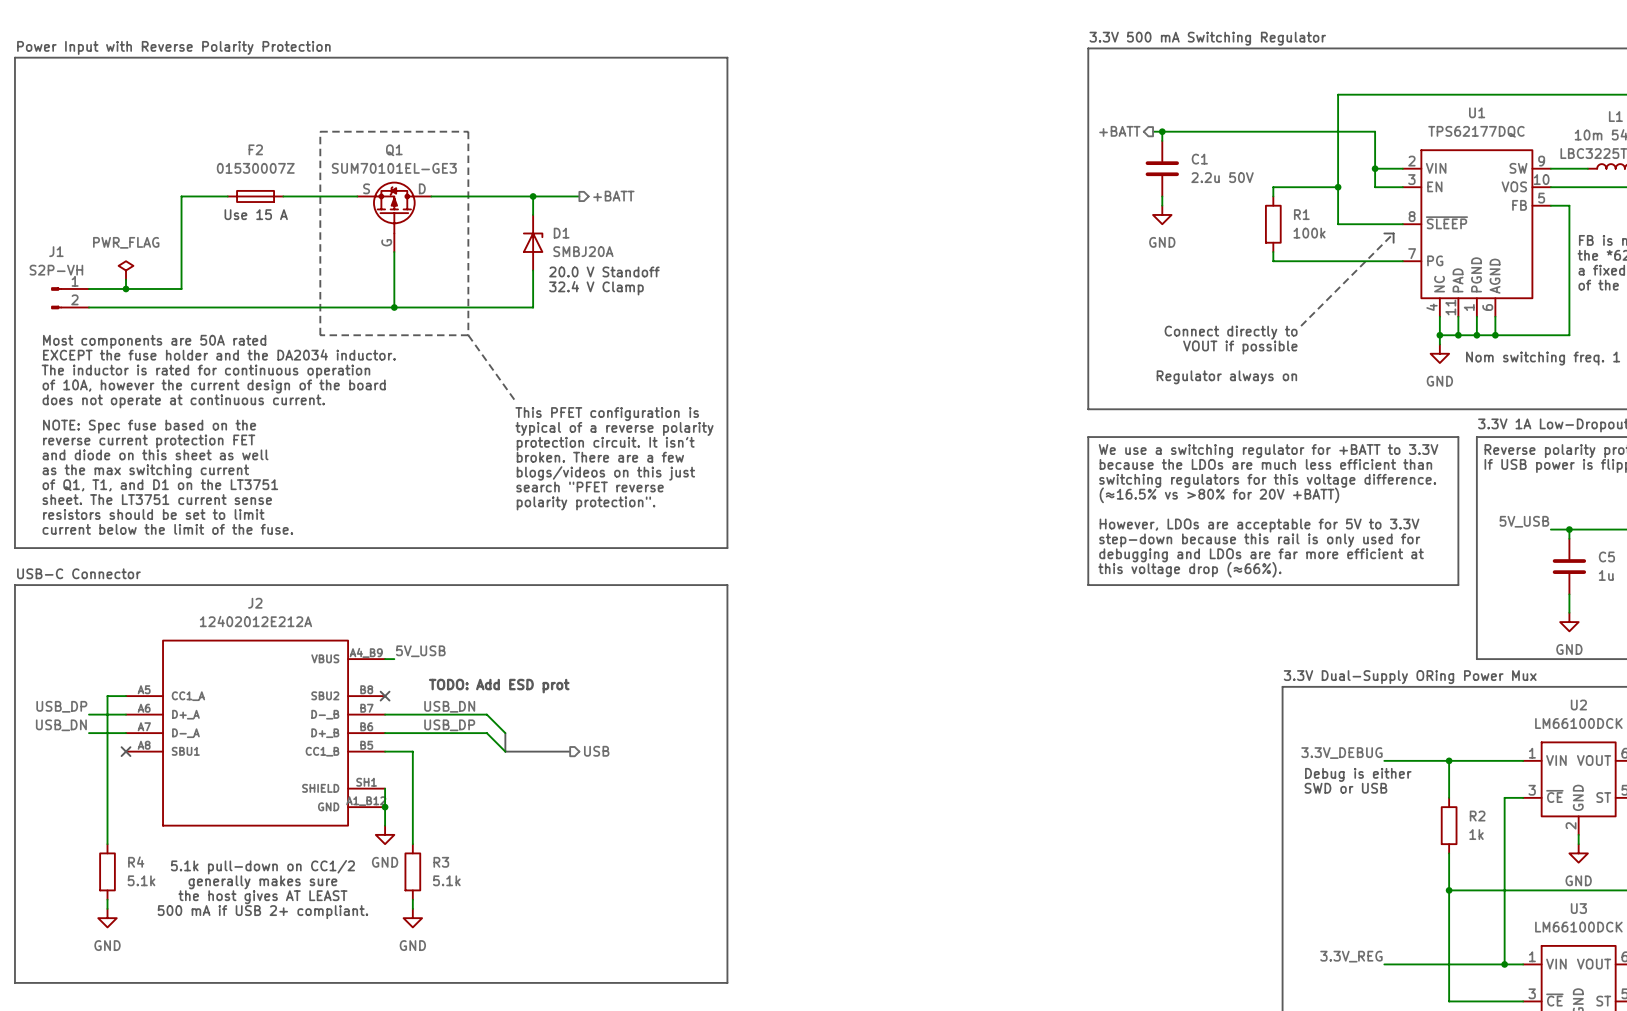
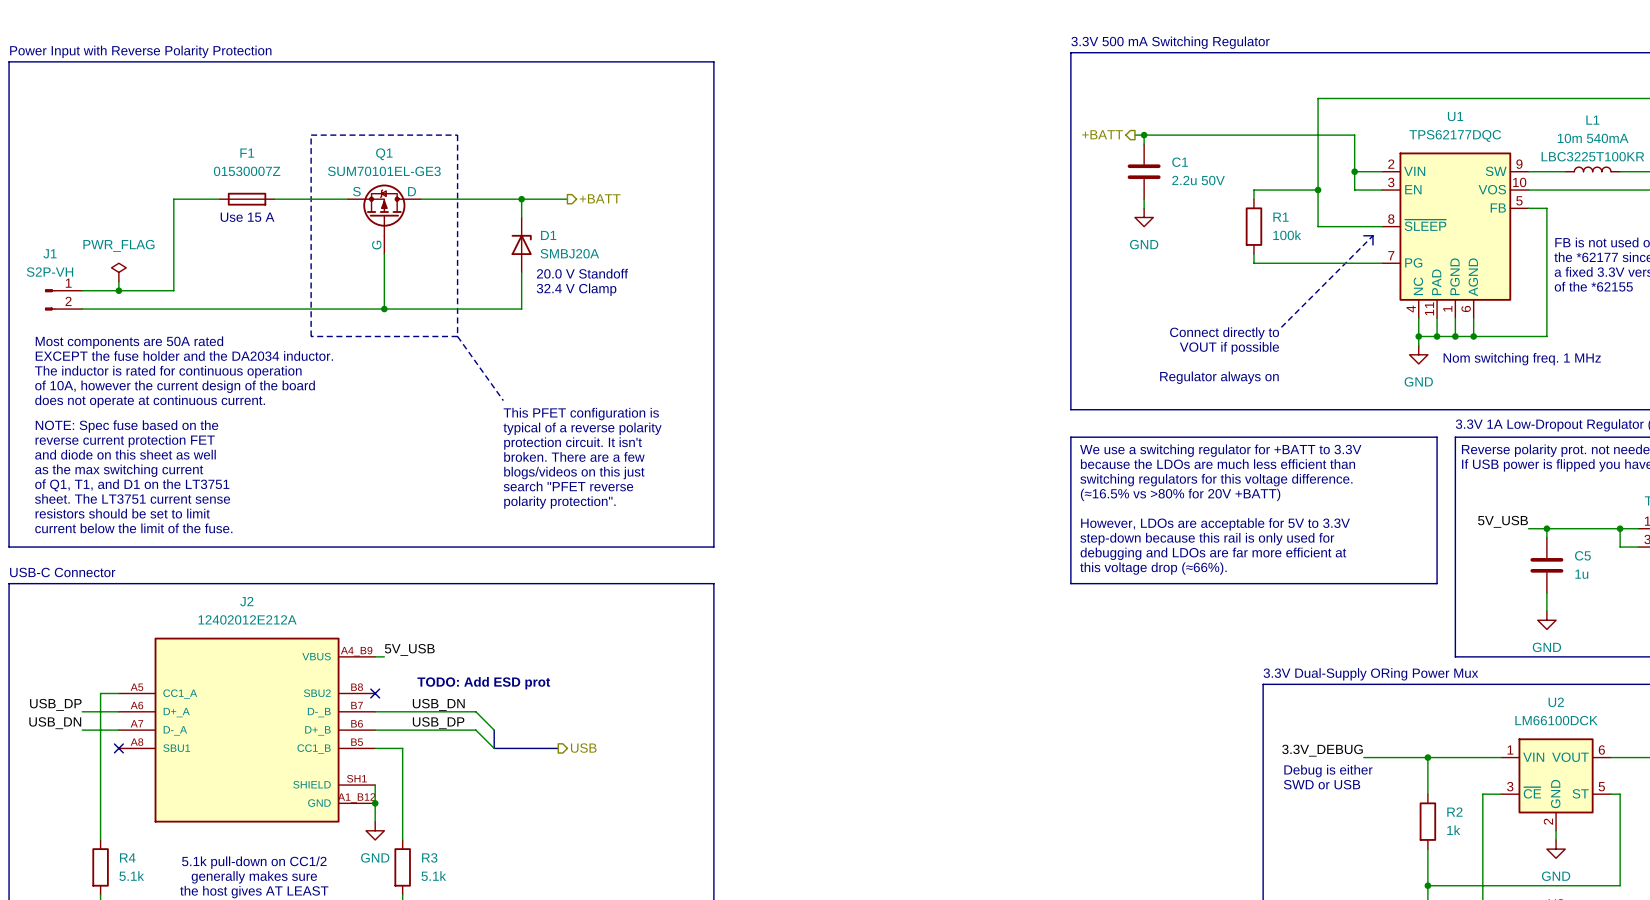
F2 name: F2 (255, 149) -> F1 (247, 153)

